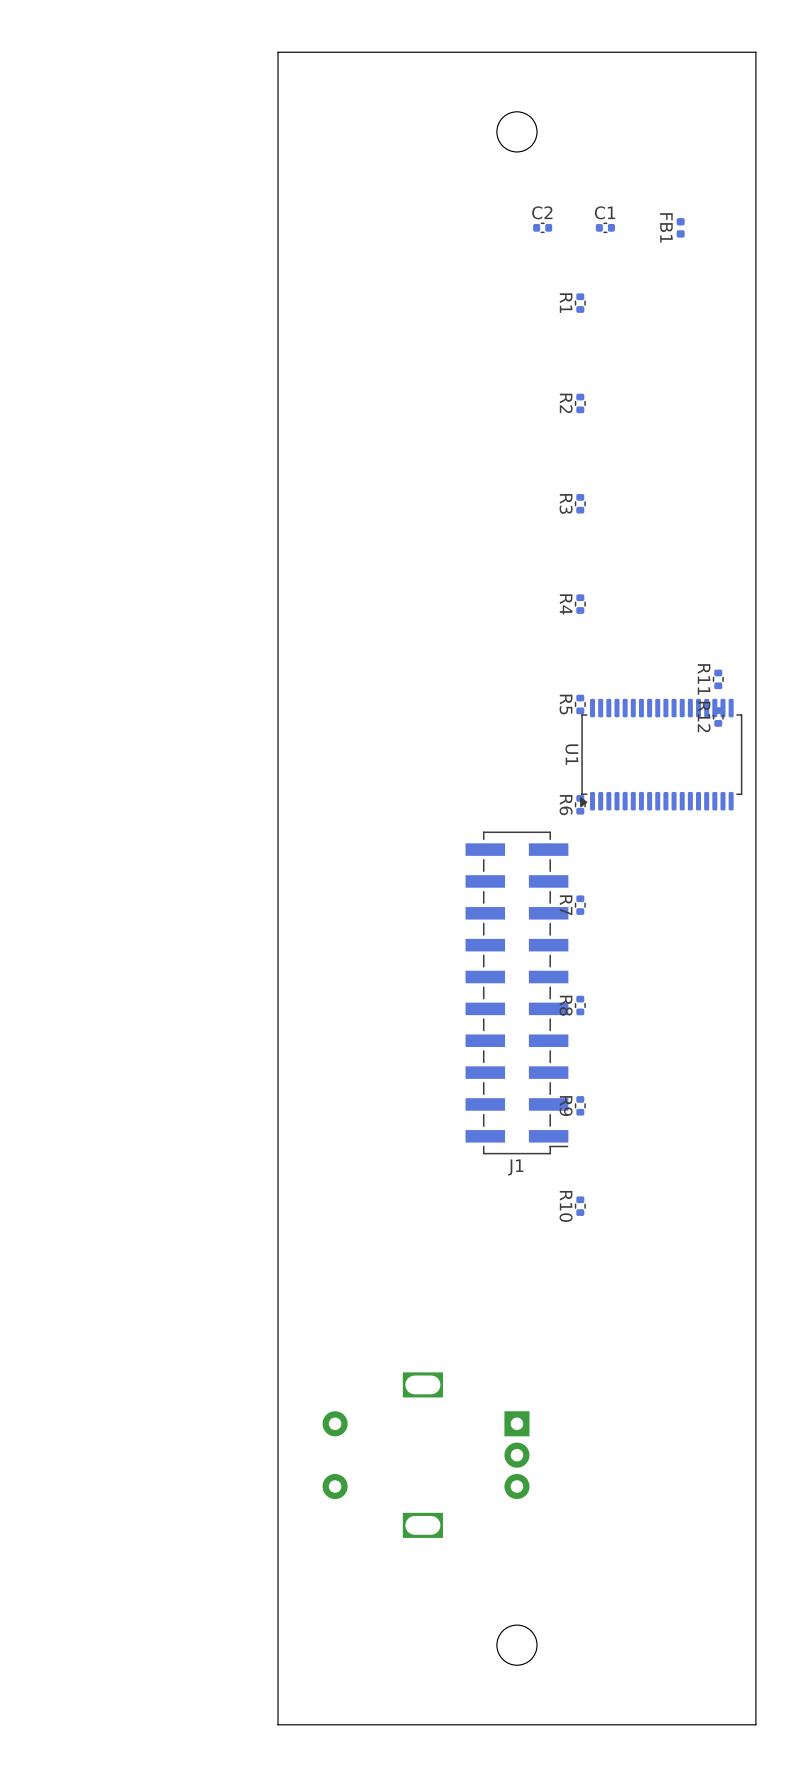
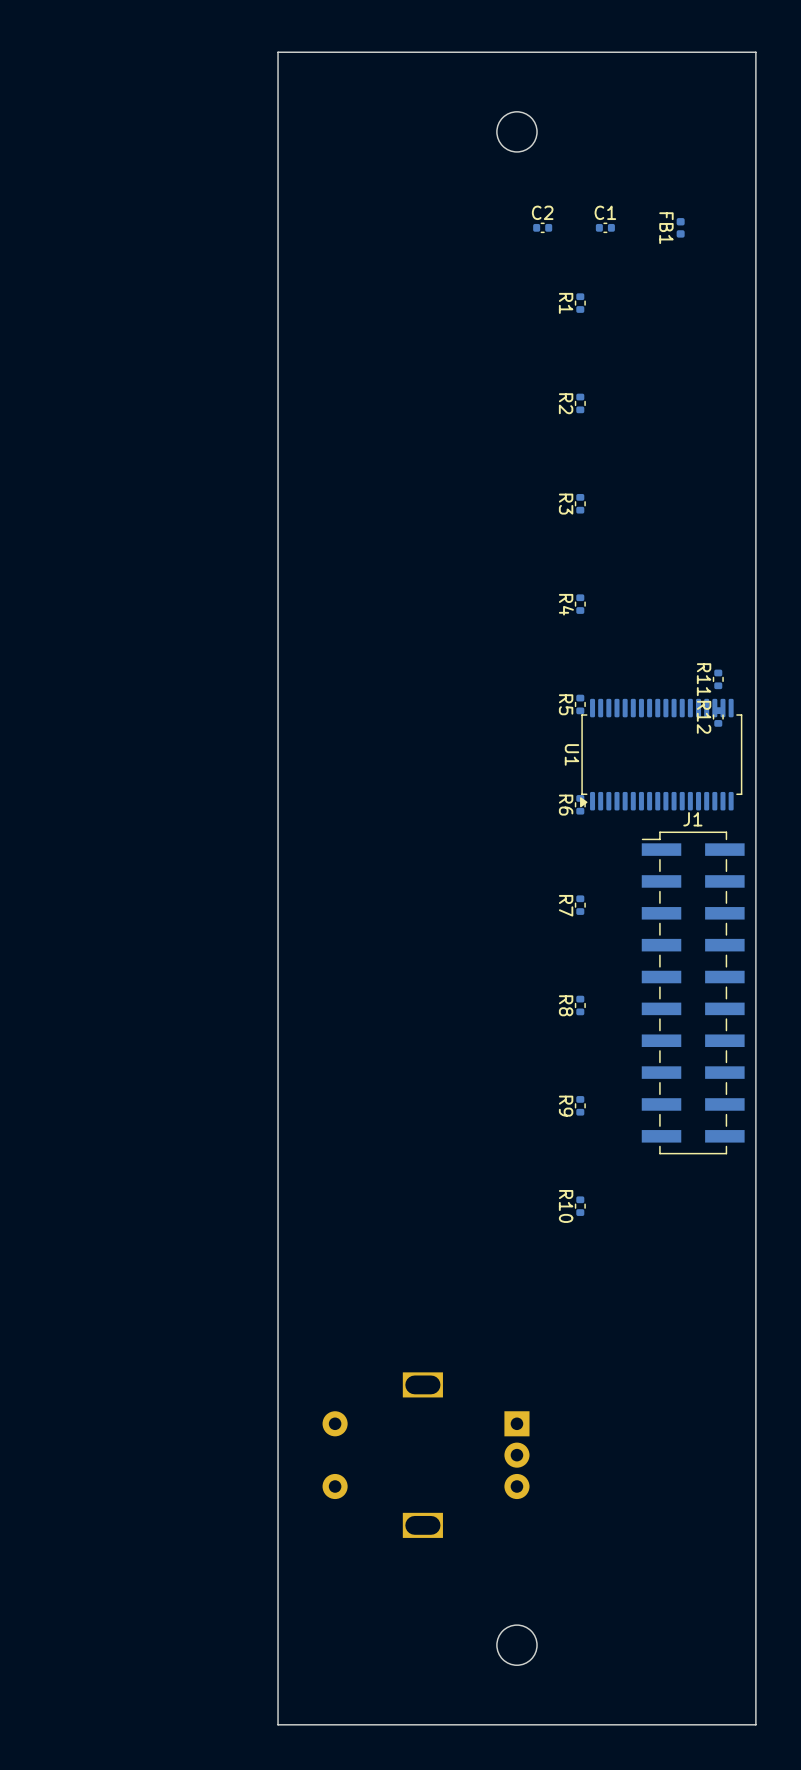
J1 rotation: 0° (516, 992) -> 180° (693, 992)

